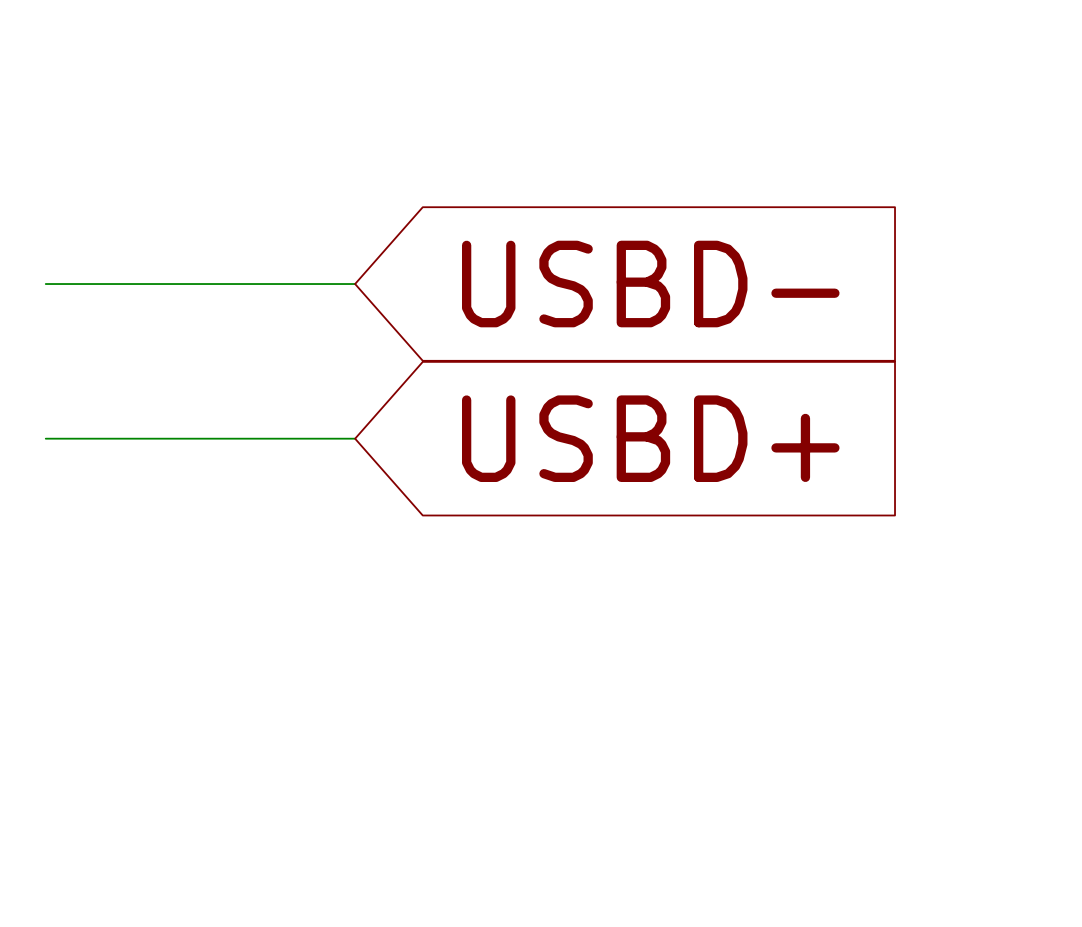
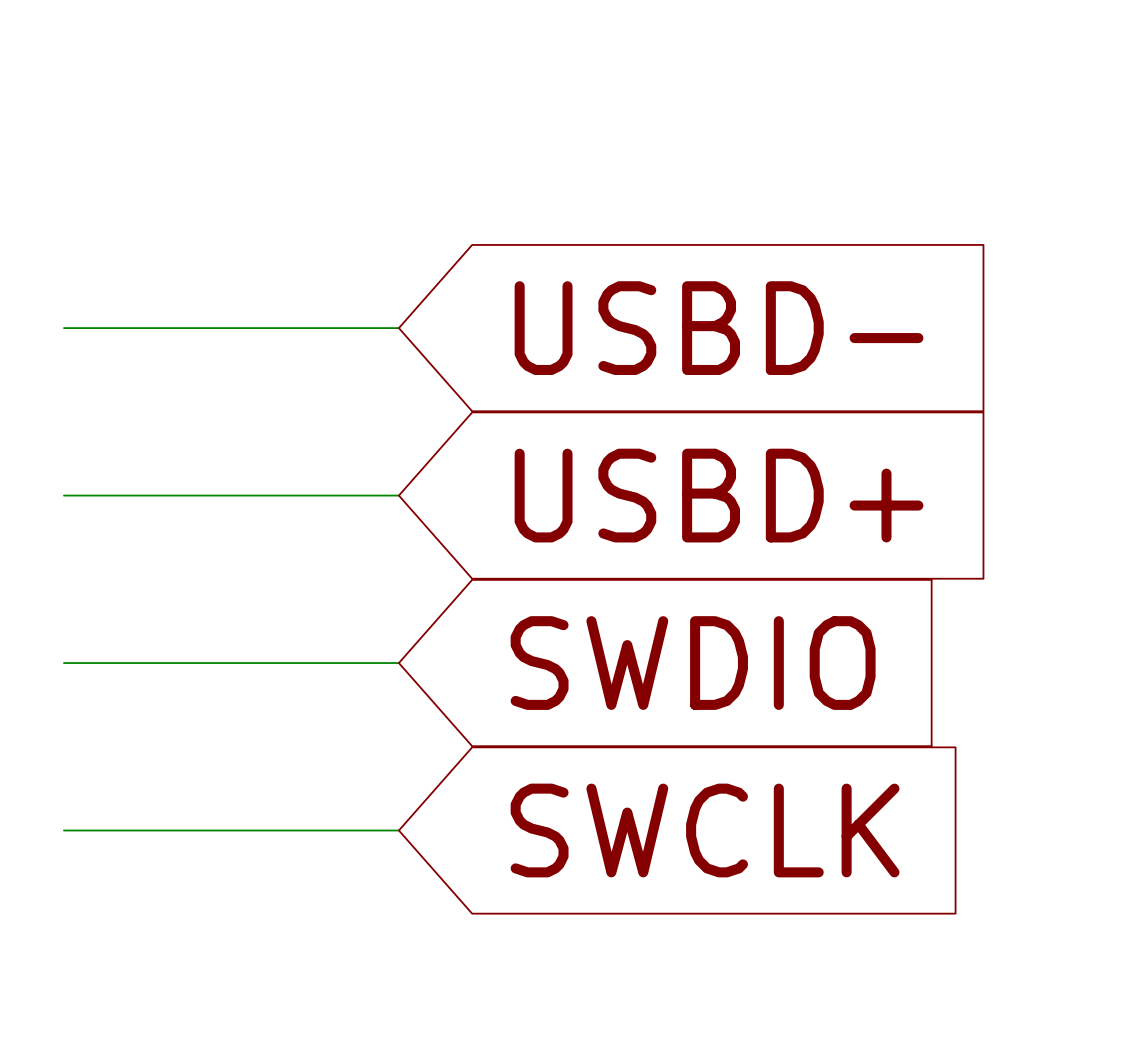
wire: none -> (63, 663) (398, 663)
global label: none -> SWDIO (693, 663)
wire: none -> (63, 830) (398, 830)
global label: none -> SWCLK (705, 830)

